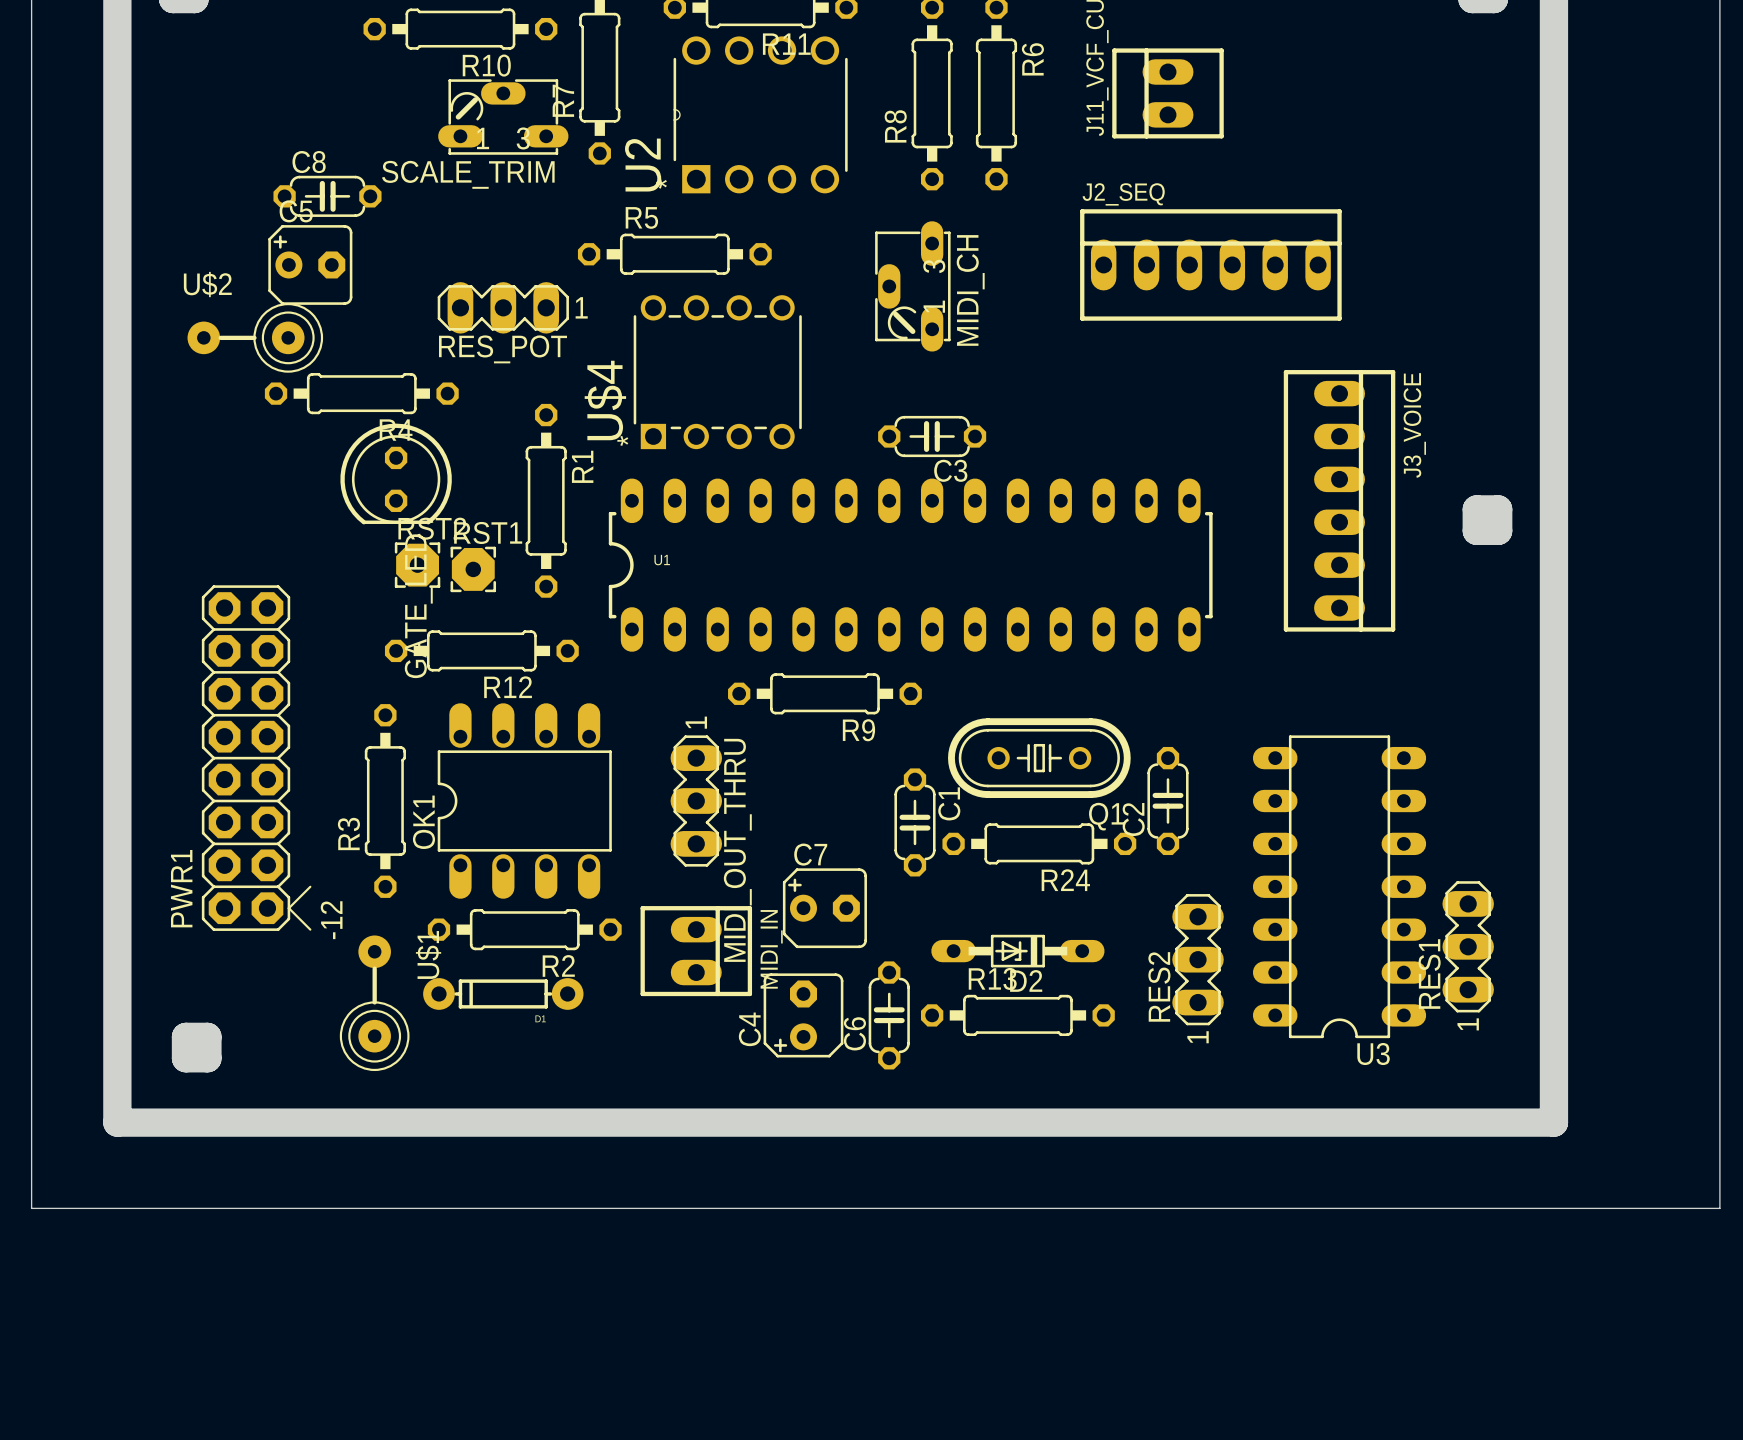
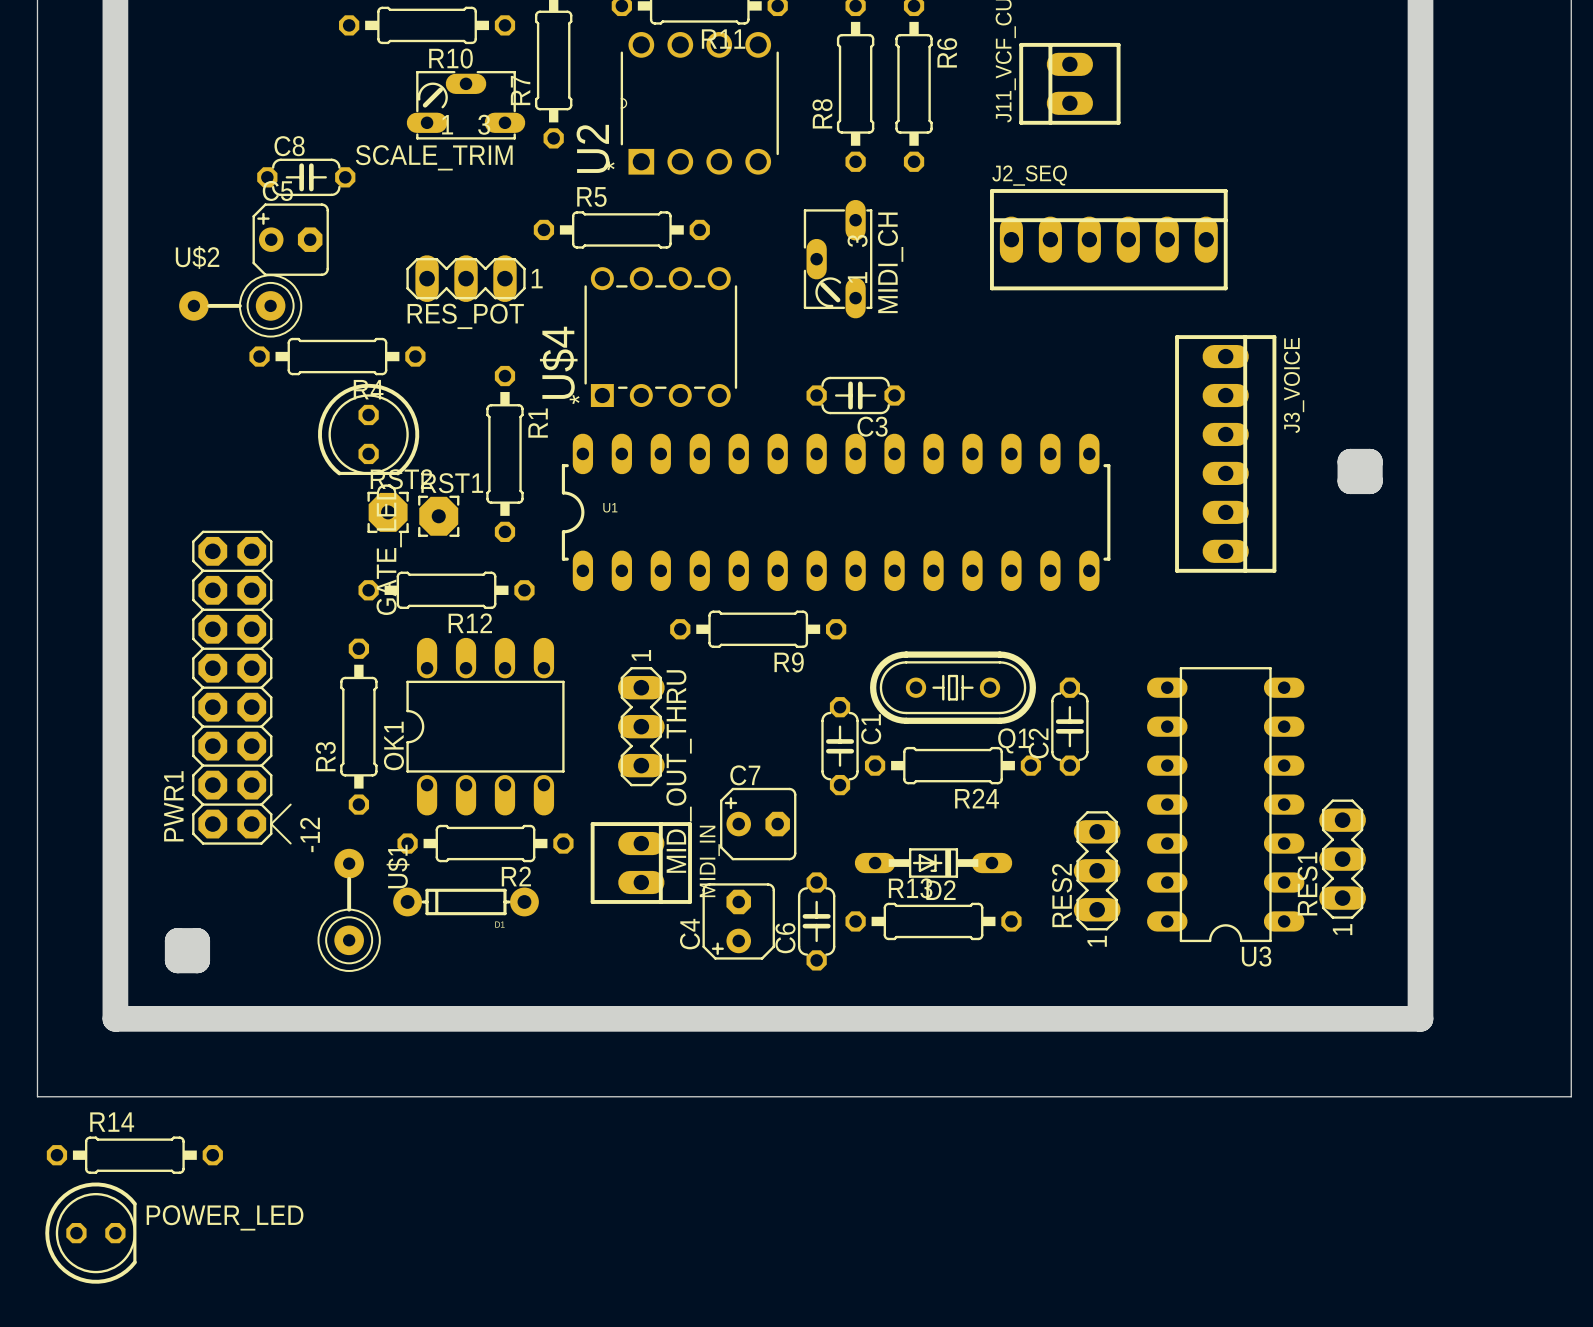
R14: none -> (134, 1155)
POWER_LED: none -> (91, 1233)

